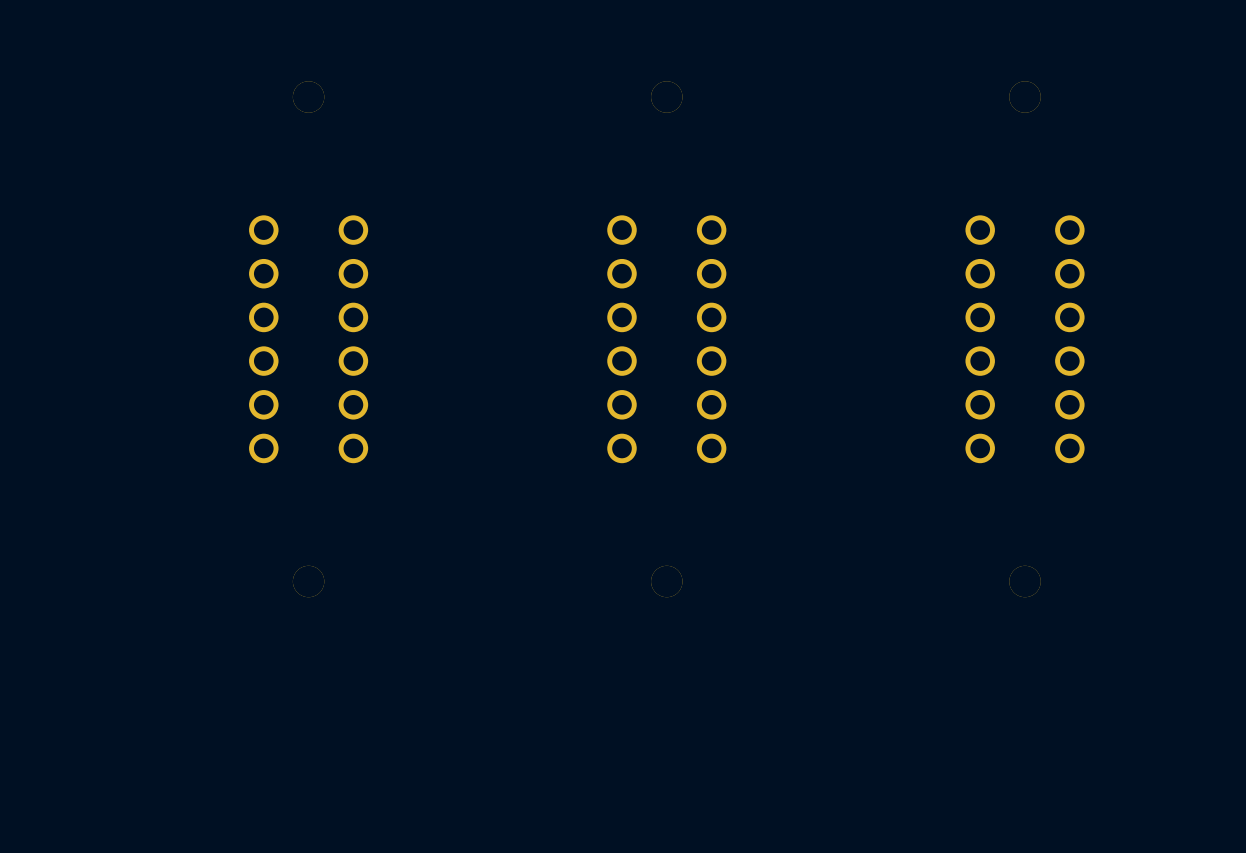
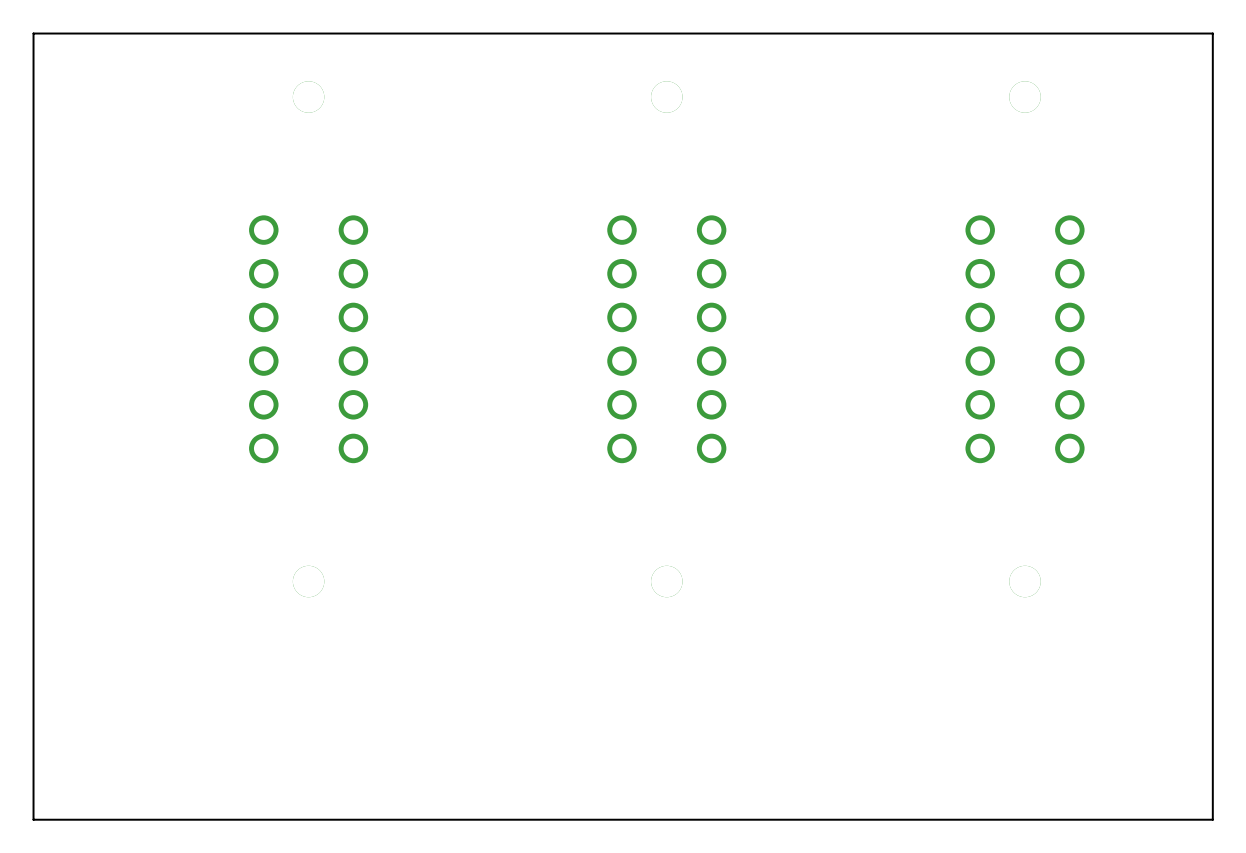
board edge: none -> (1212, 33) (33, 33) (33, 819) (1212, 819) (1212, 33)

